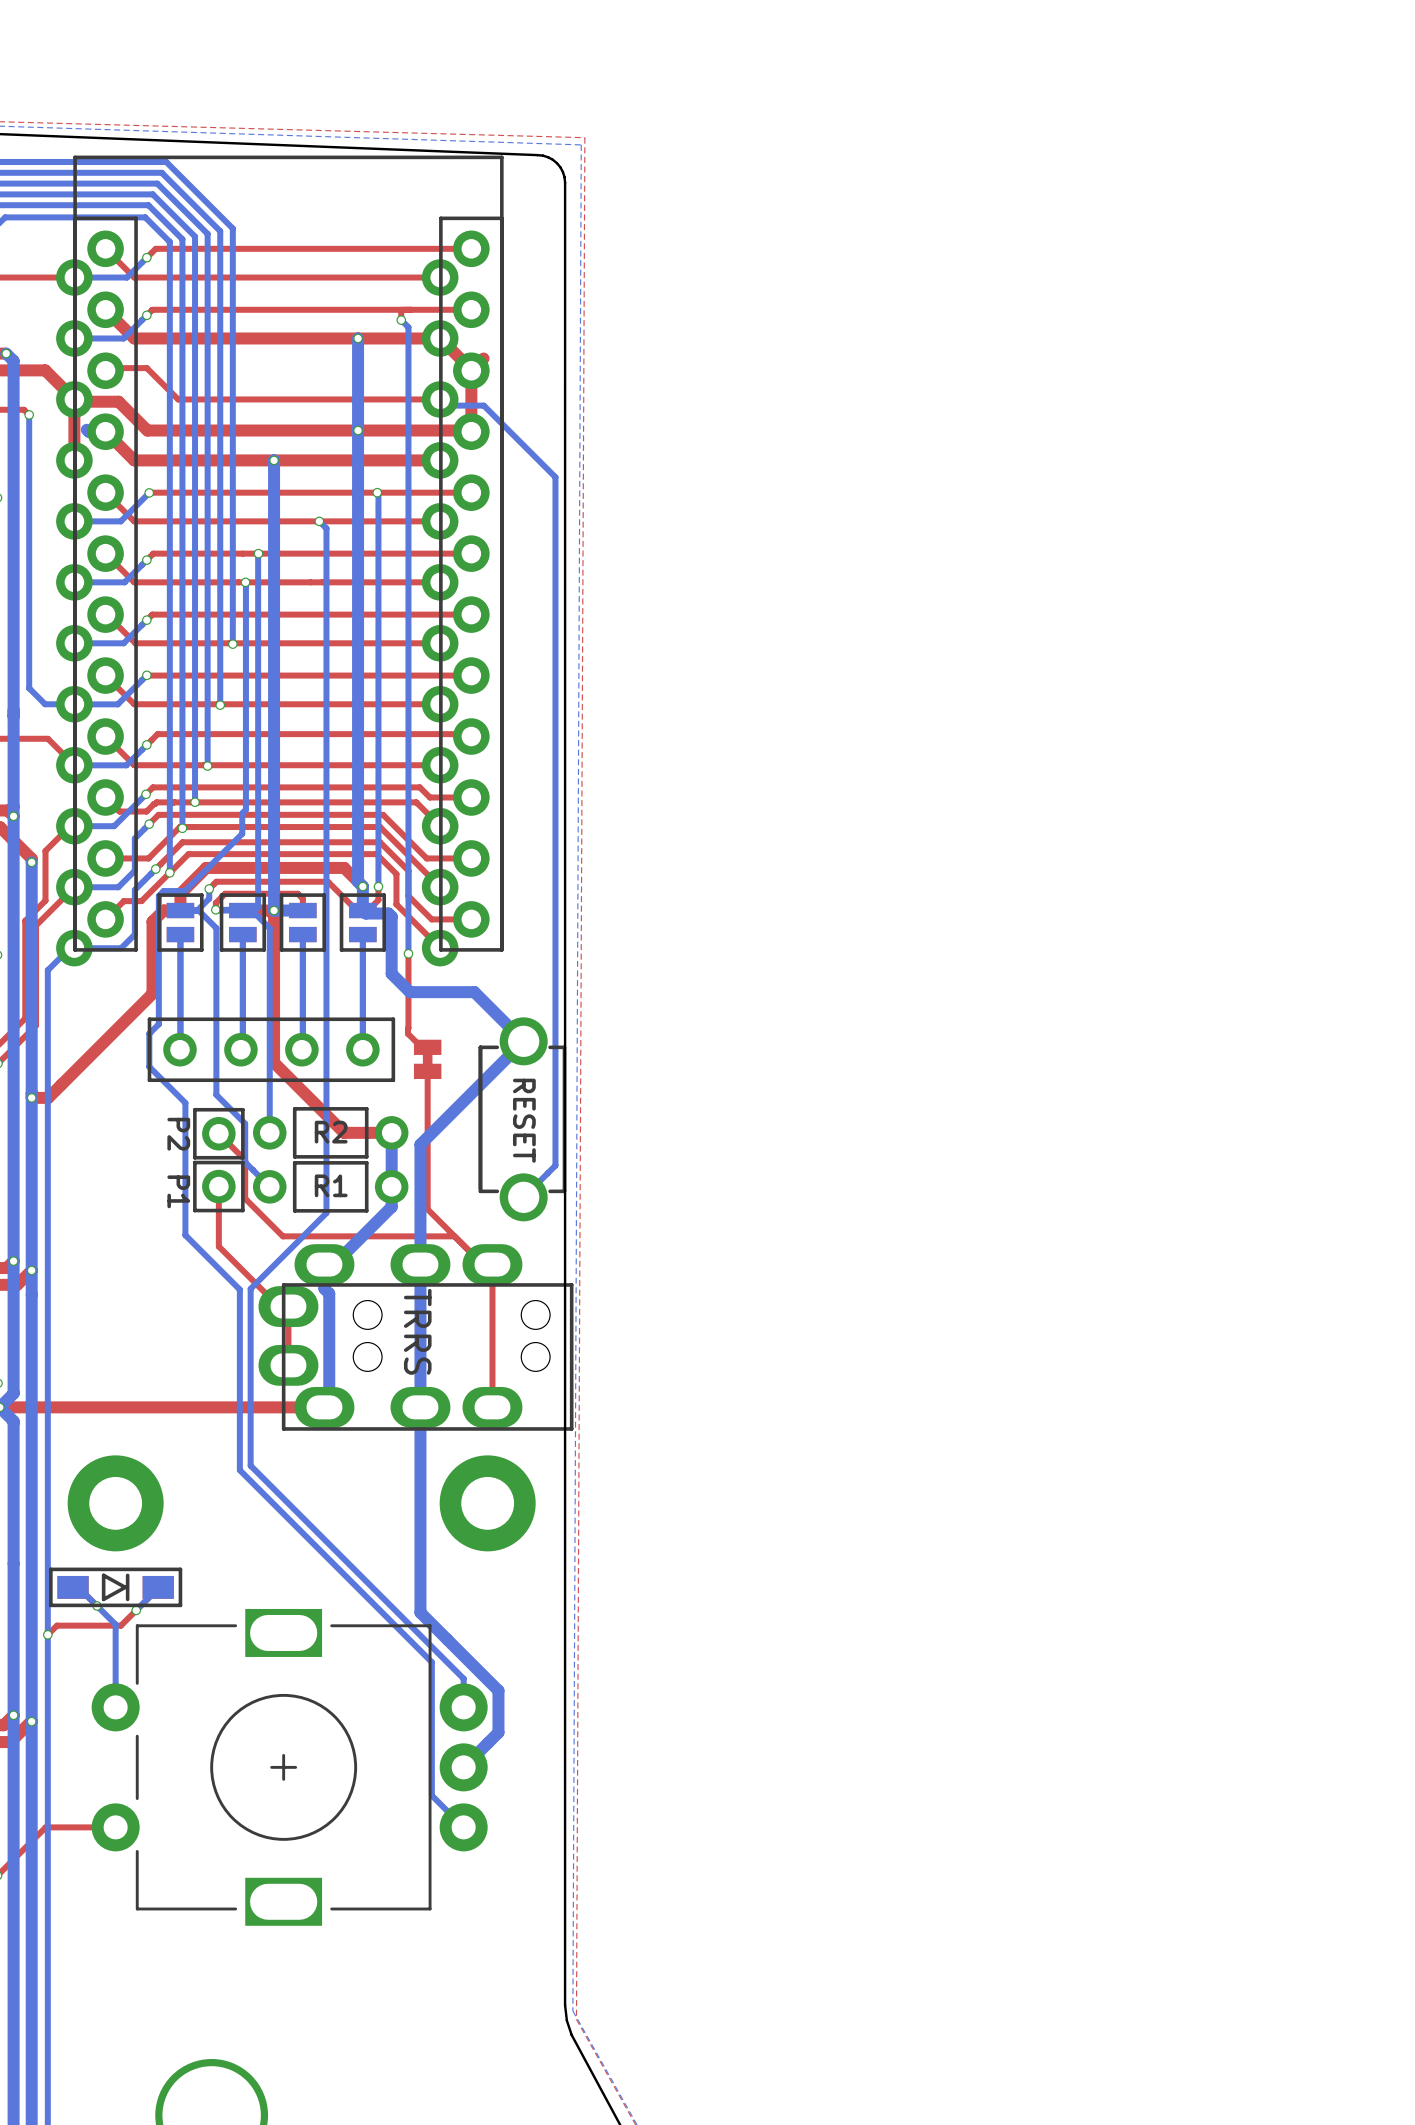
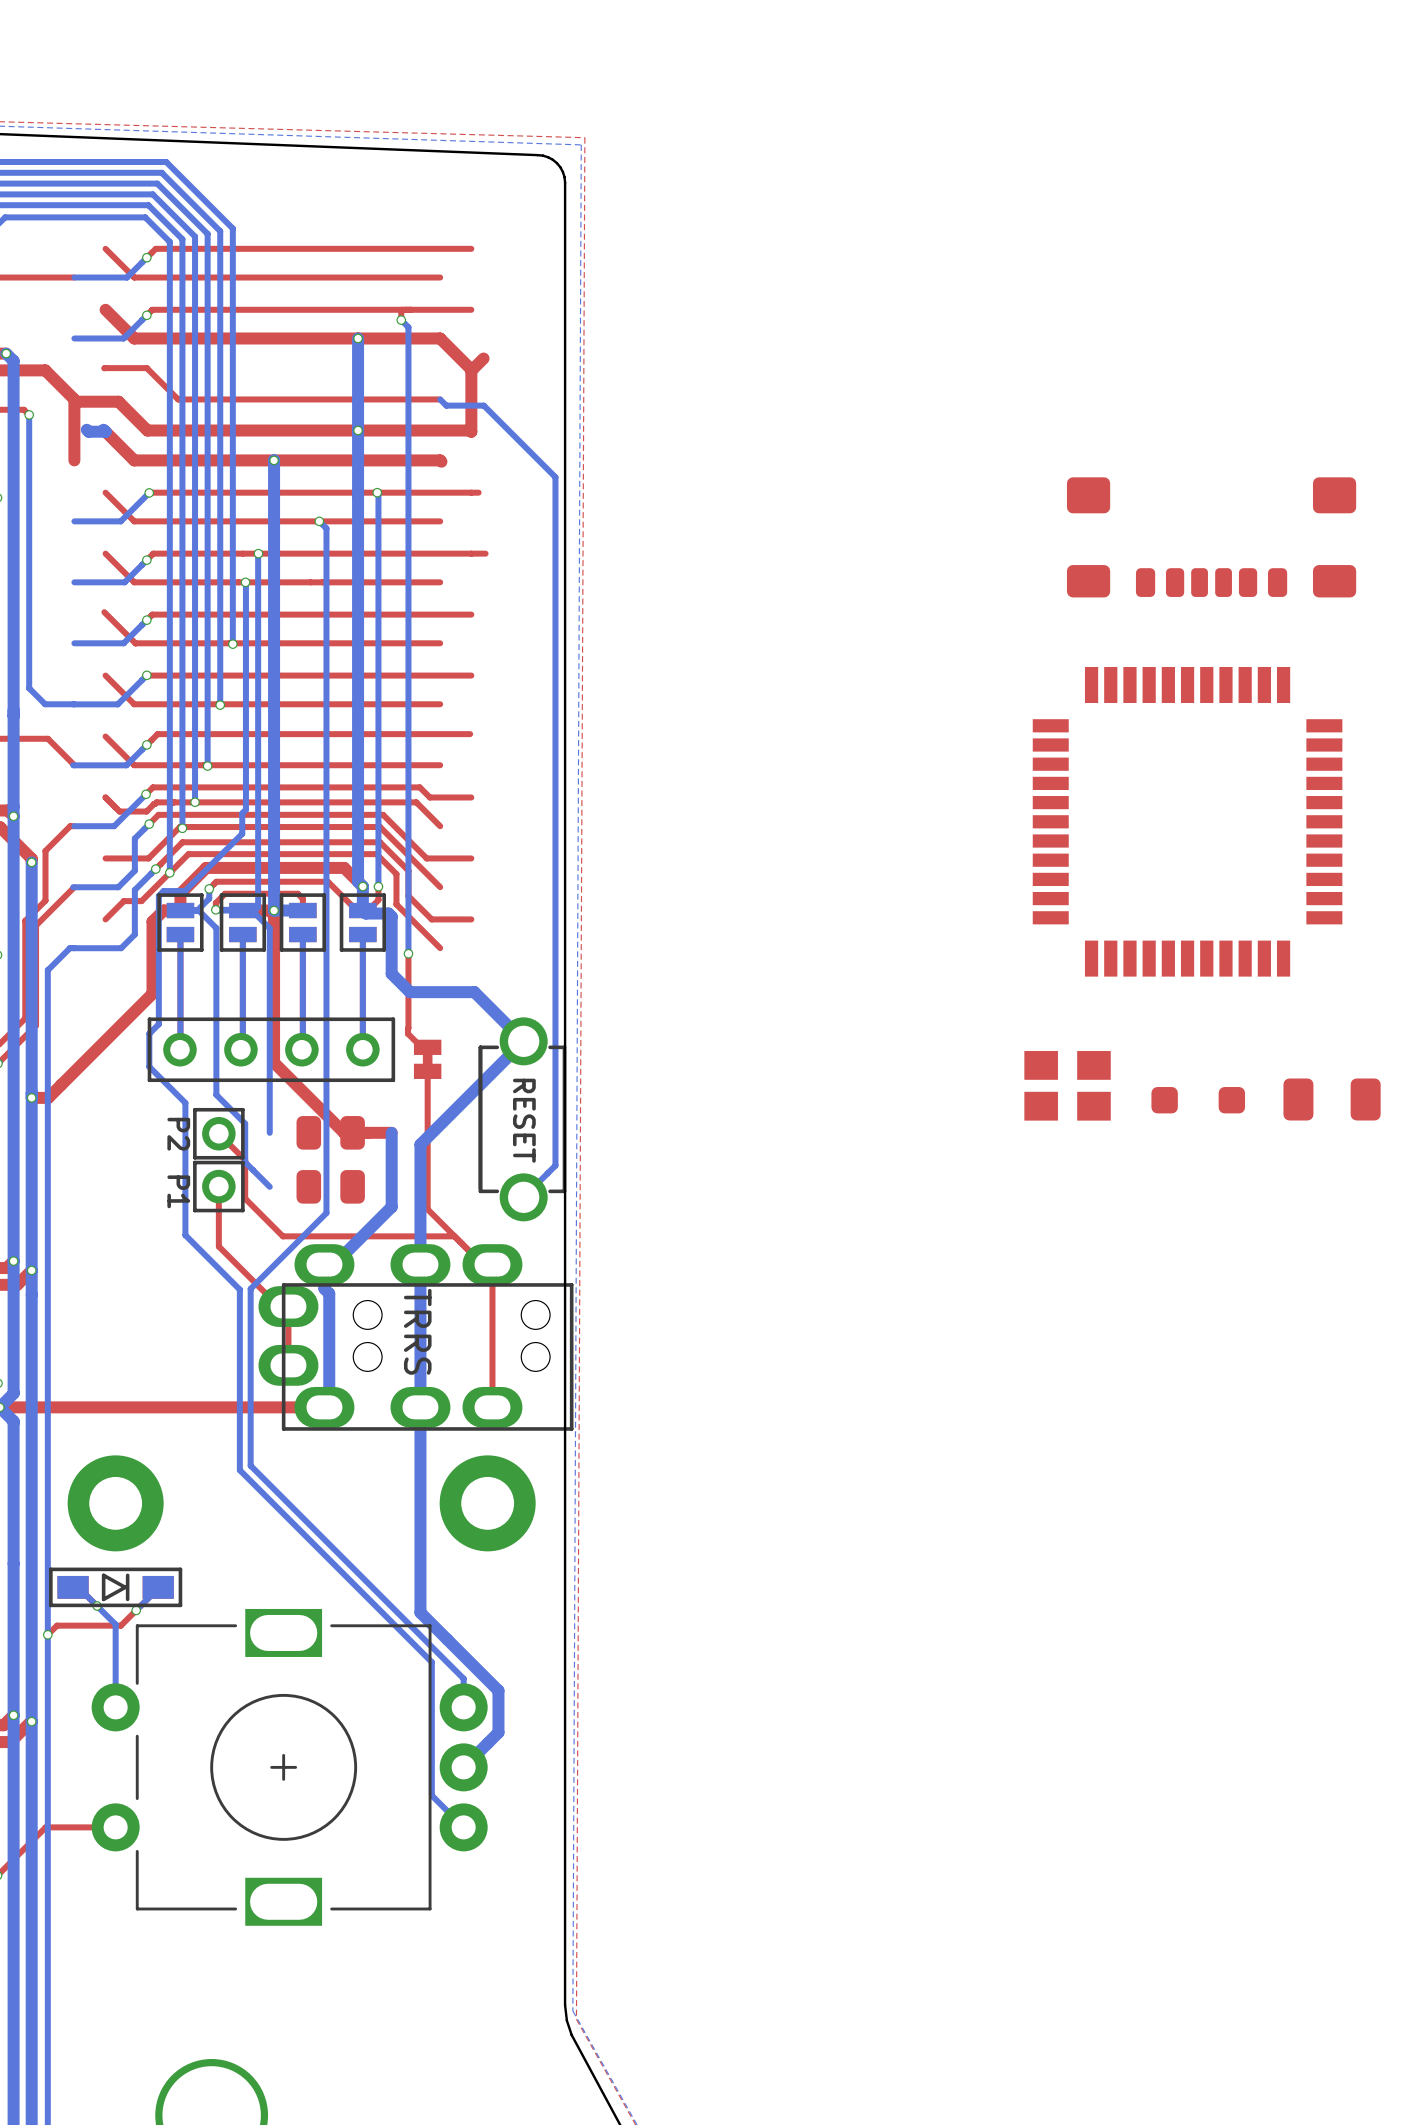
part: none -> (1211, 537)
part: (279, 560) -> none
part: none -> (1187, 821)
part: none -> (1067, 1085)
part: none -> (1332, 1099)
part: none -> (1198, 1100)
part footprint: [252, 1107, 409, 1159] -> [296, 1116, 365, 1150]
part footprint: [252, 1161, 409, 1213] -> [296, 1170, 365, 1204]

